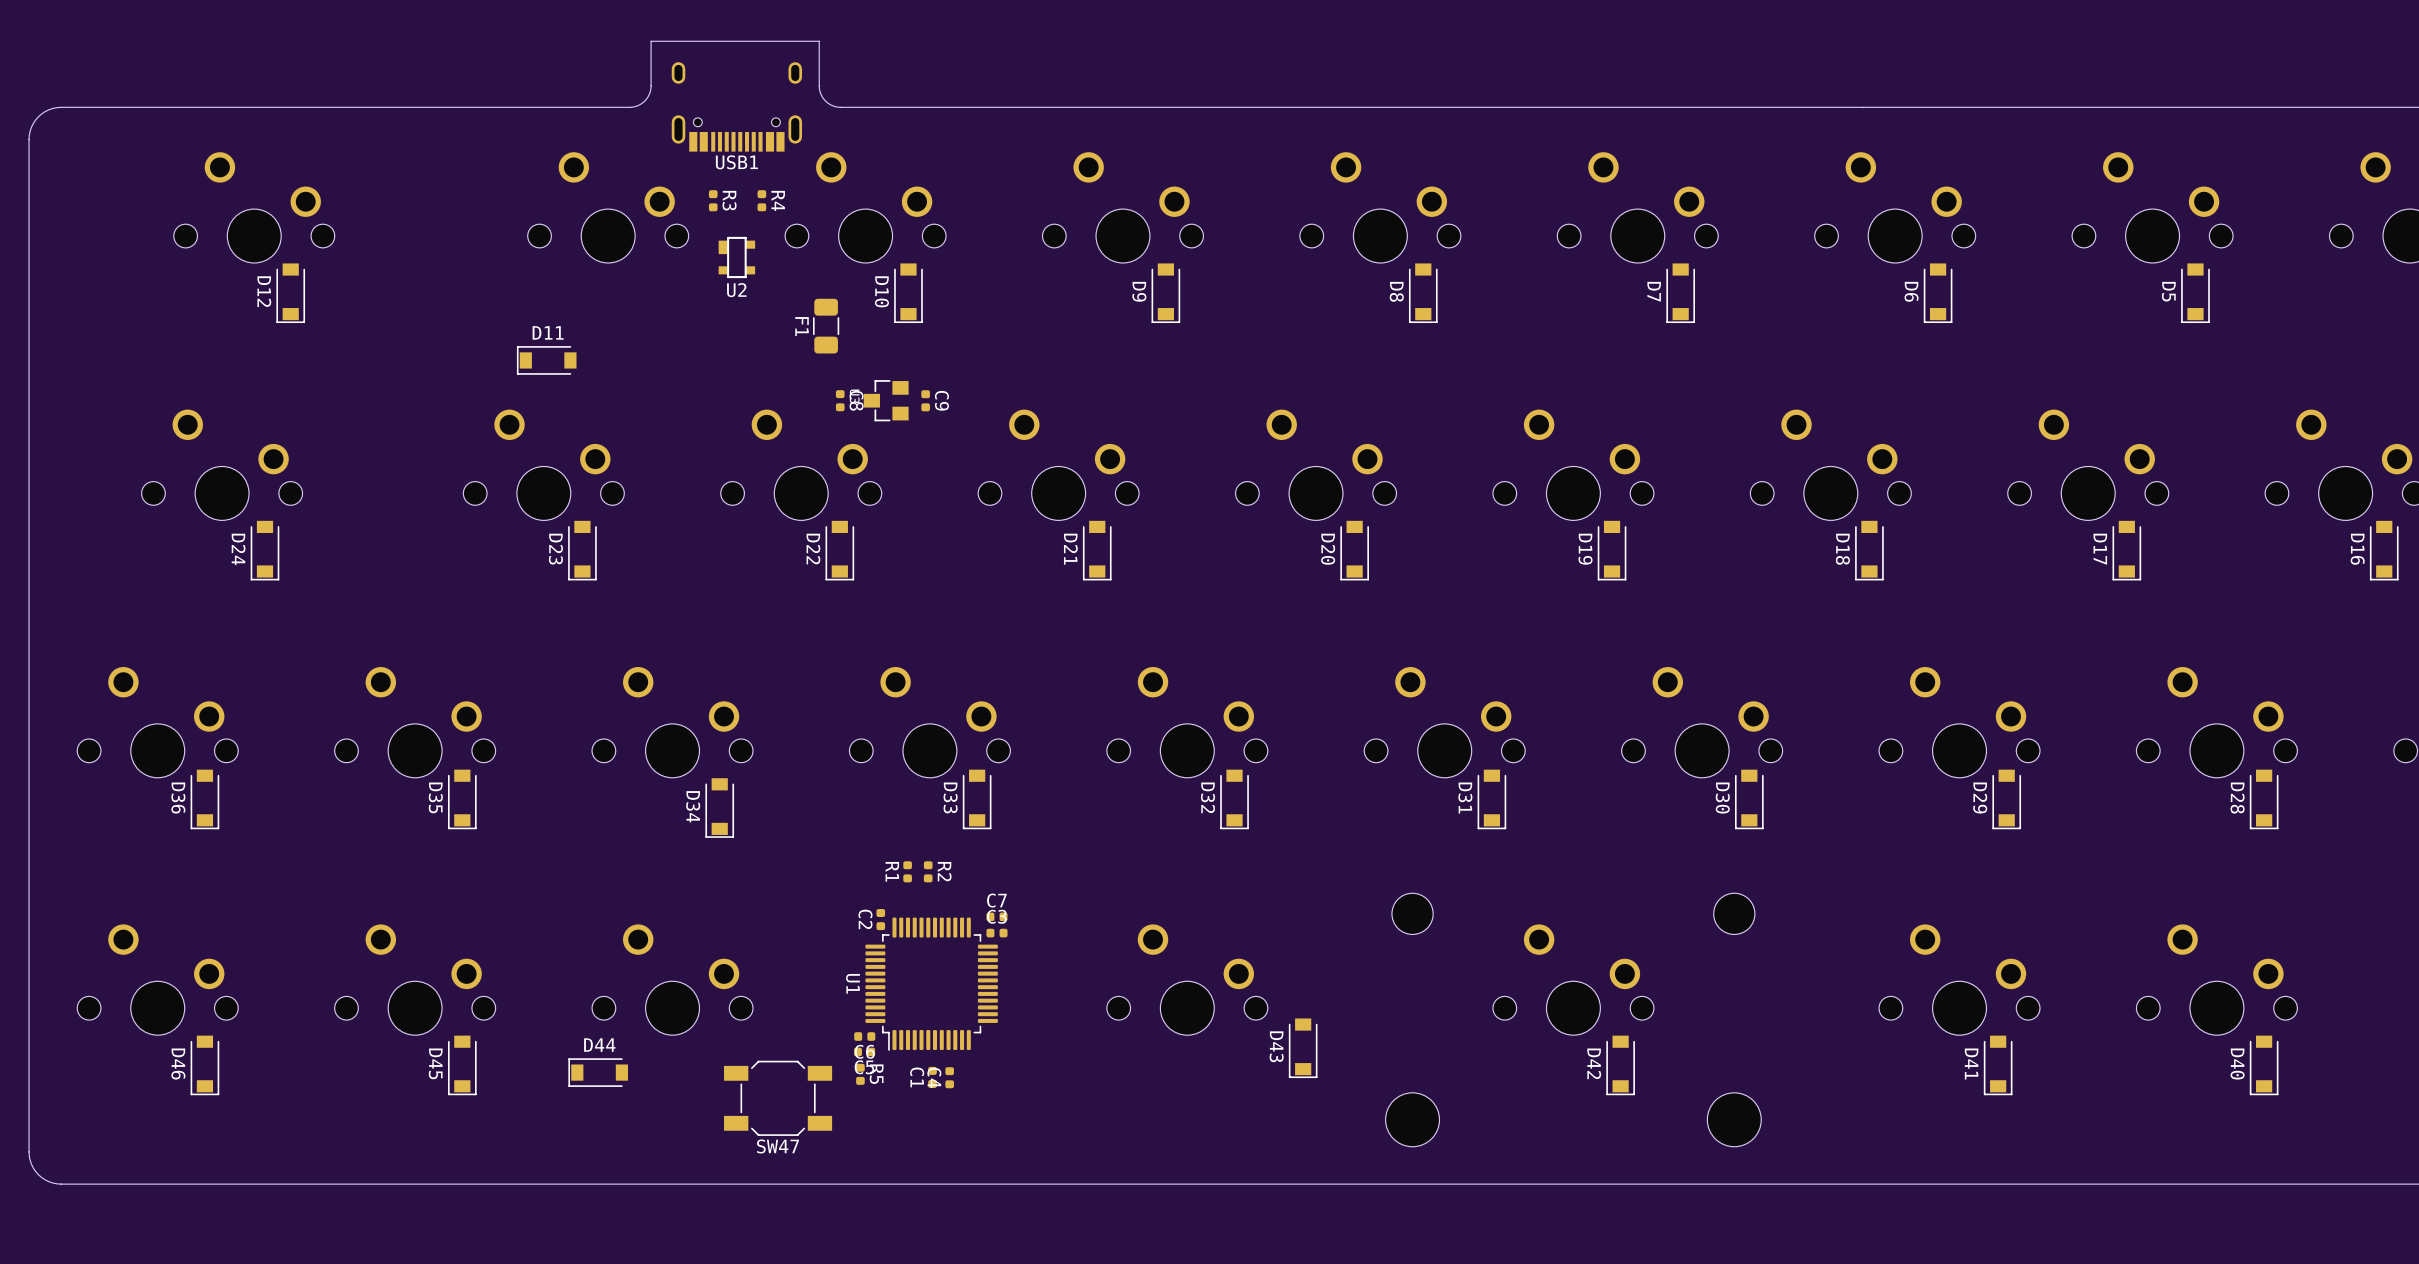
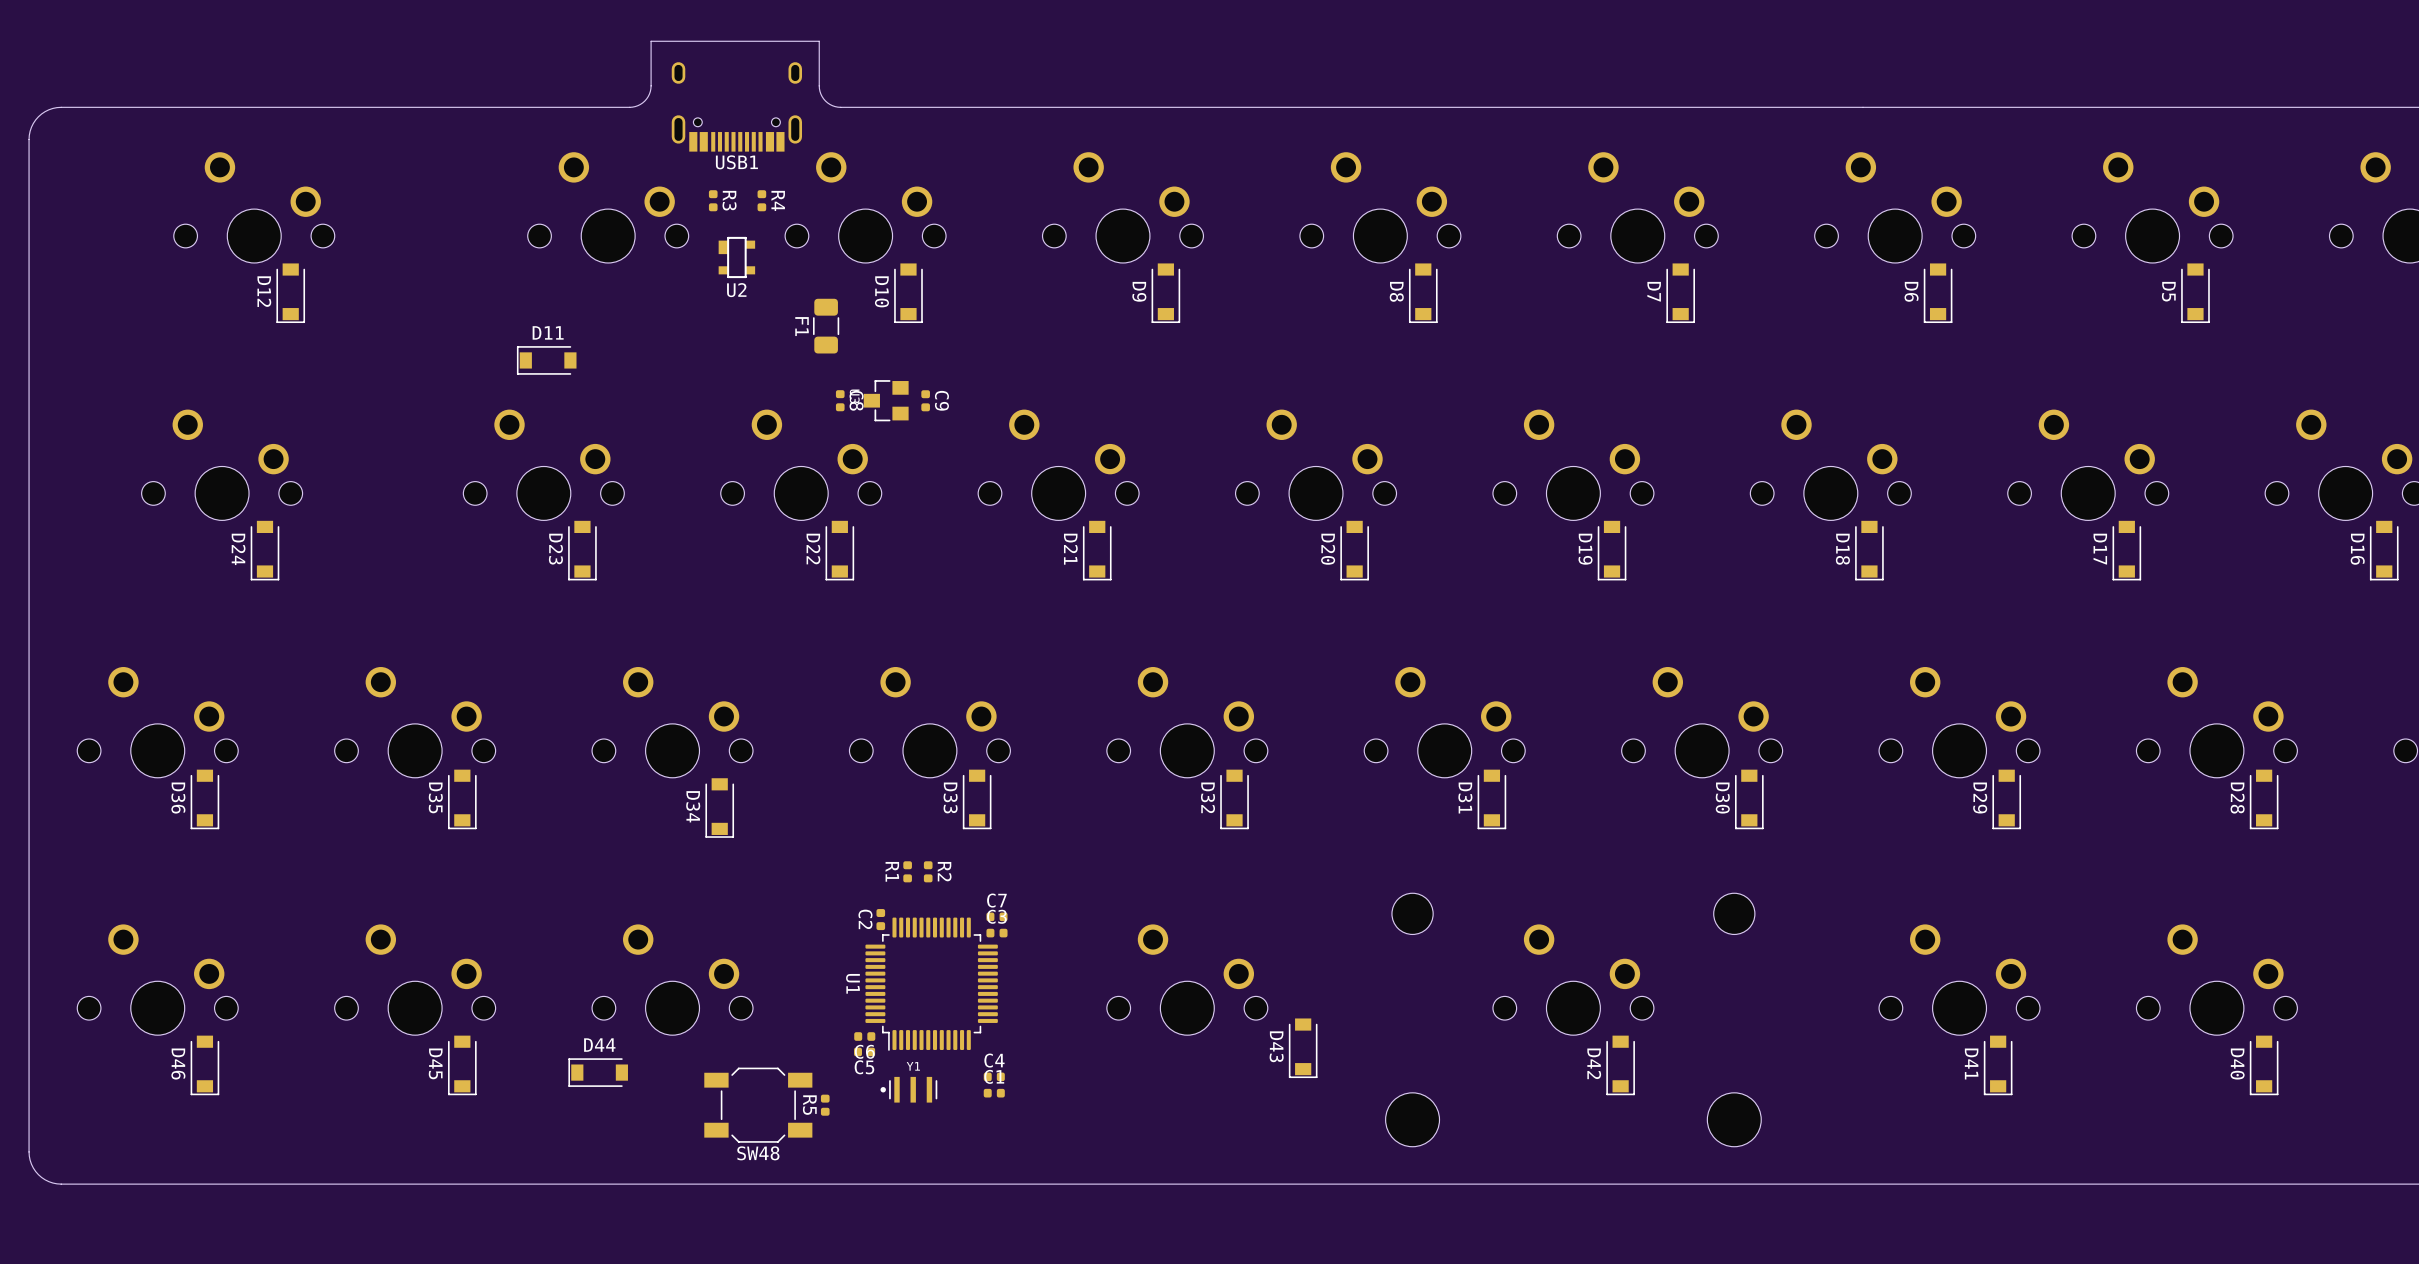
R5 position: (860, 1074) -> (825, 1105)
R5 name position: R5 (876, 1074) -> R5 (809, 1105)
C1 rotation: 0° (932, 1077) -> 90° clockwise (994, 1093)
C1 position: (932, 1077) -> (994, 1093)
C4 rotation: 0° (949, 1077) -> 90° clockwise (994, 1076)
C4 position: (949, 1077) -> (994, 1076)
Y1: none -> (908, 1089)
SW47: (778, 1098) -> none
SW48: none -> (758, 1105)

